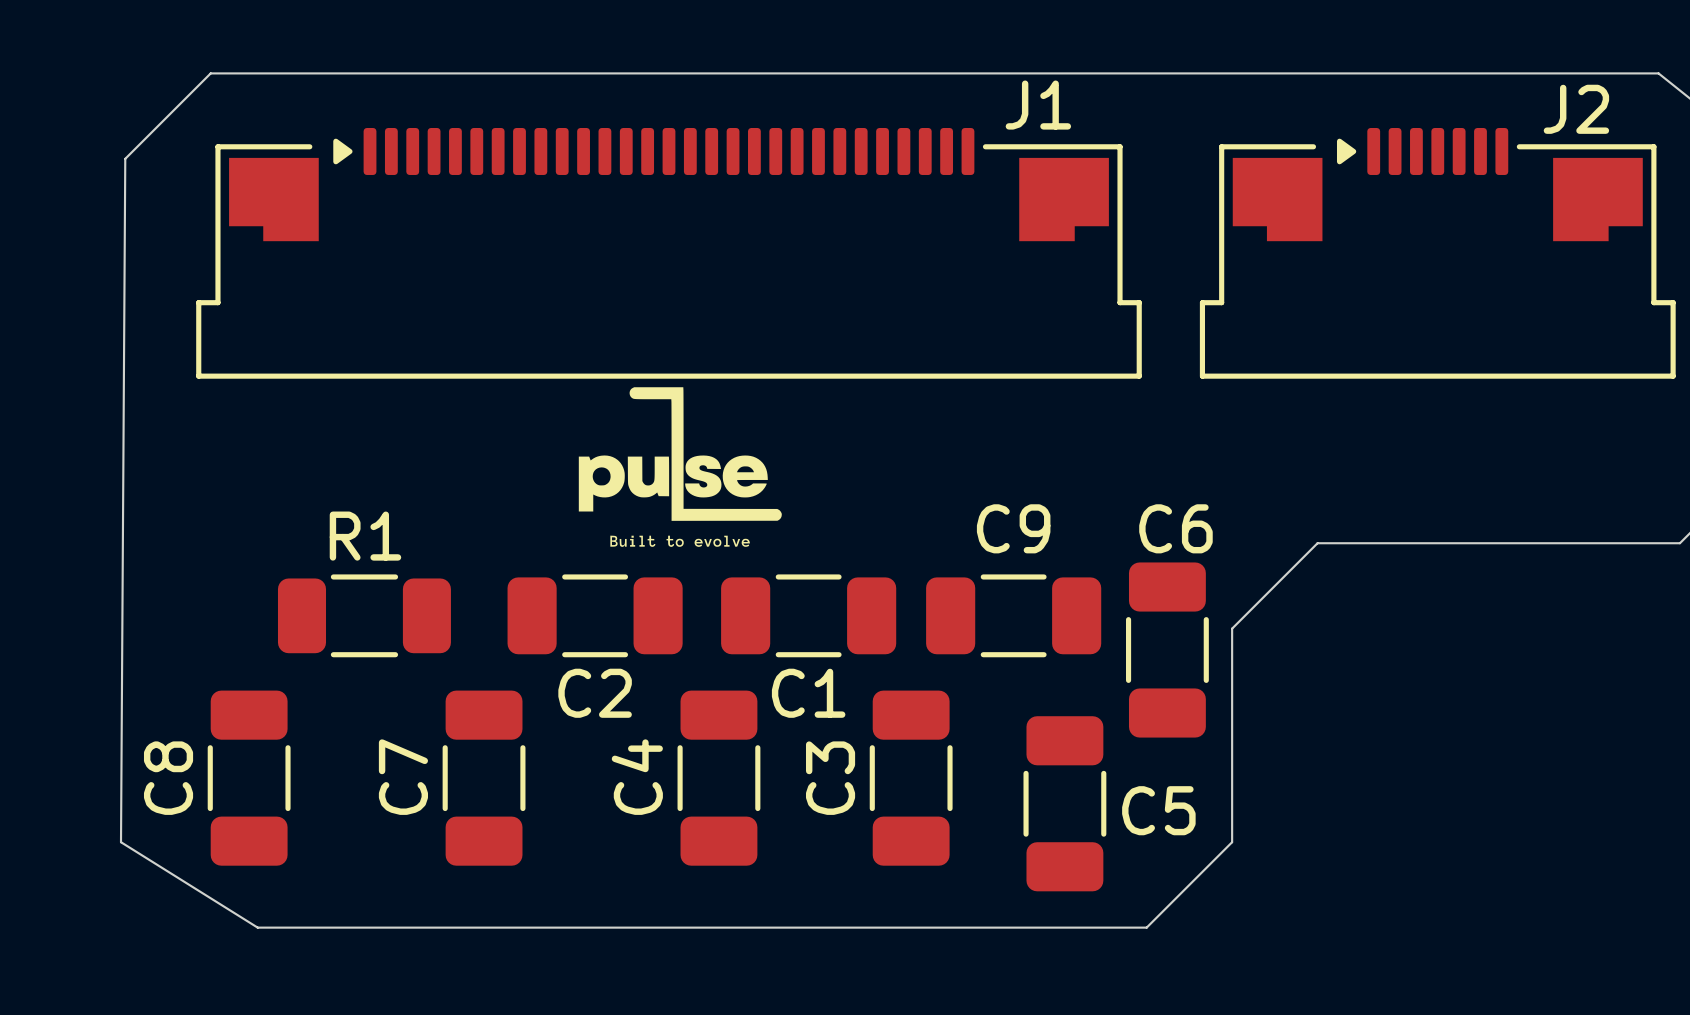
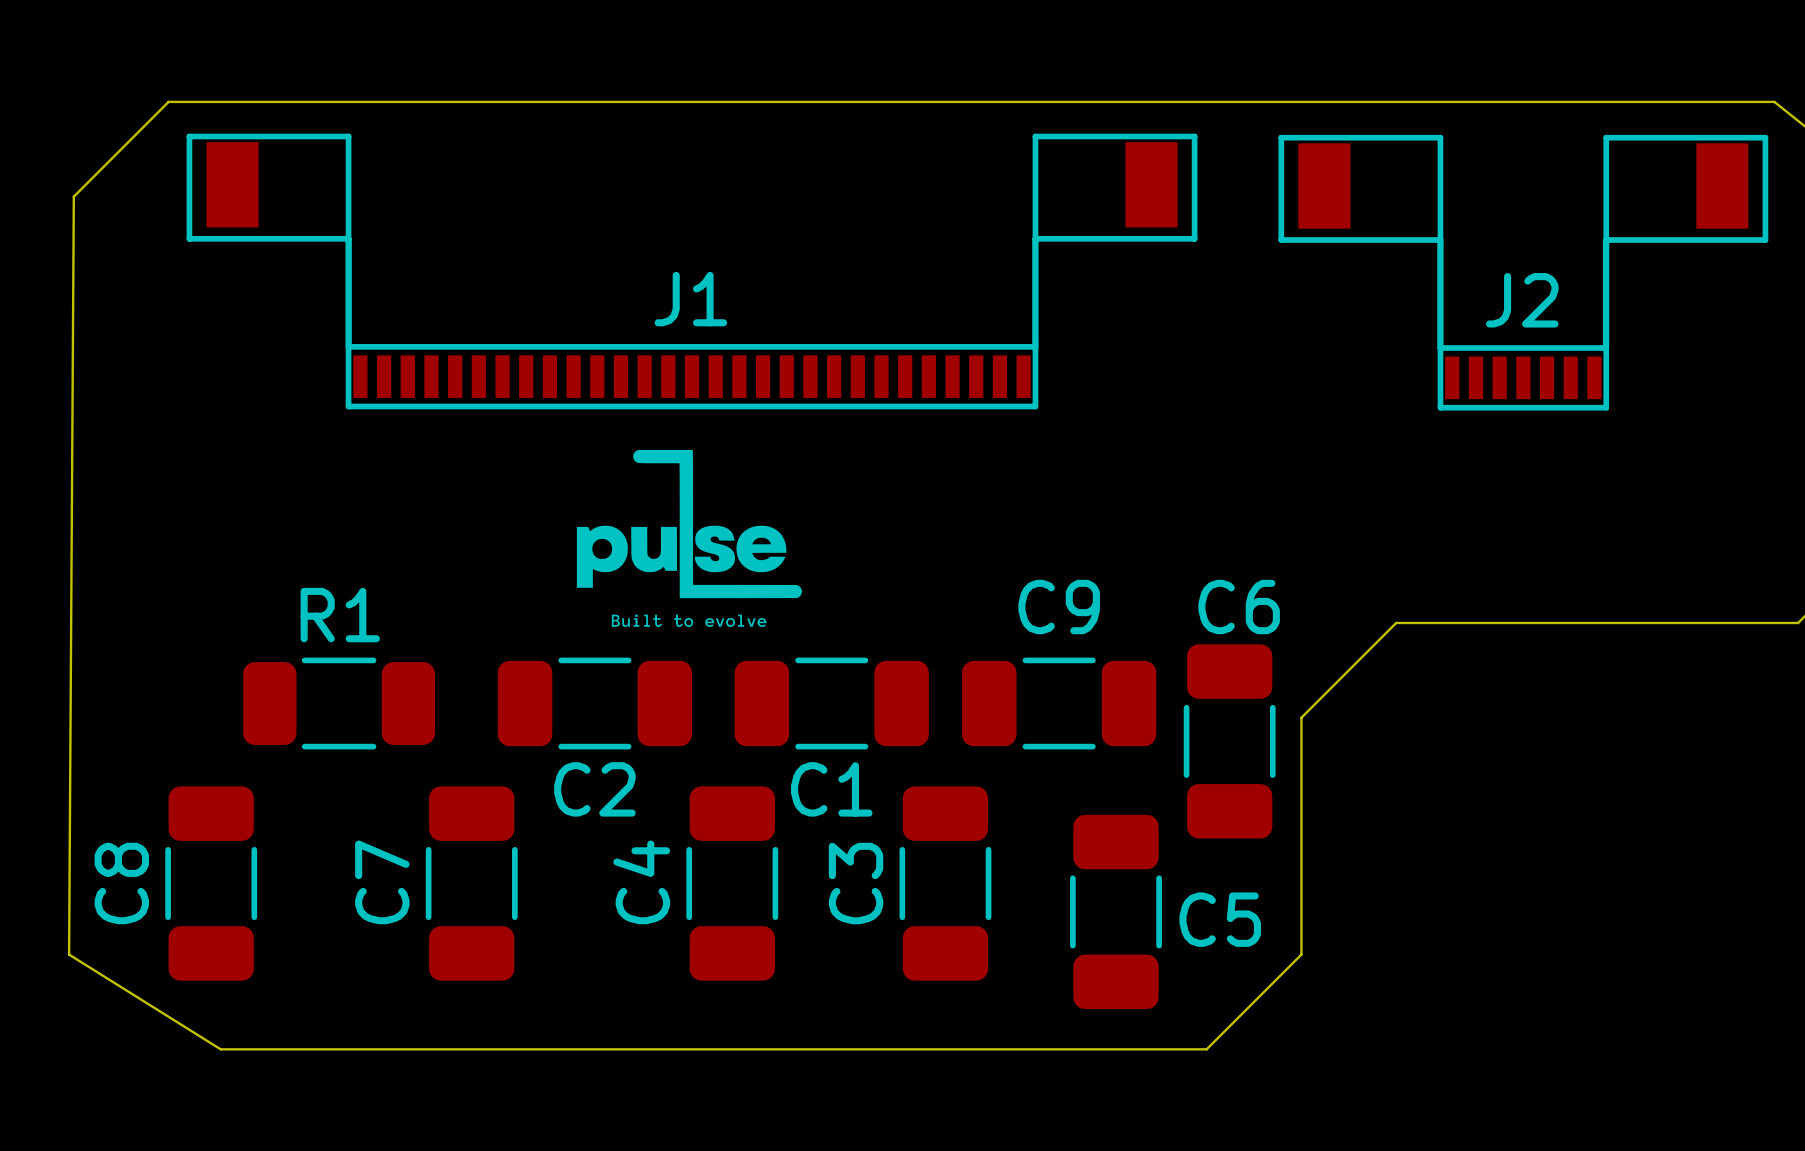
J1 name position: J1 (1038, 105) -> J1 (690, 299)
J2 name position: J2 (1576, 109) -> J2 (1522, 300)
J1 footprint: [196, 128, 1142, 379] -> [186, 133, 1198, 410]
J2 footprint: [1199, 128, 1676, 379] -> [1278, 134, 1769, 411]

